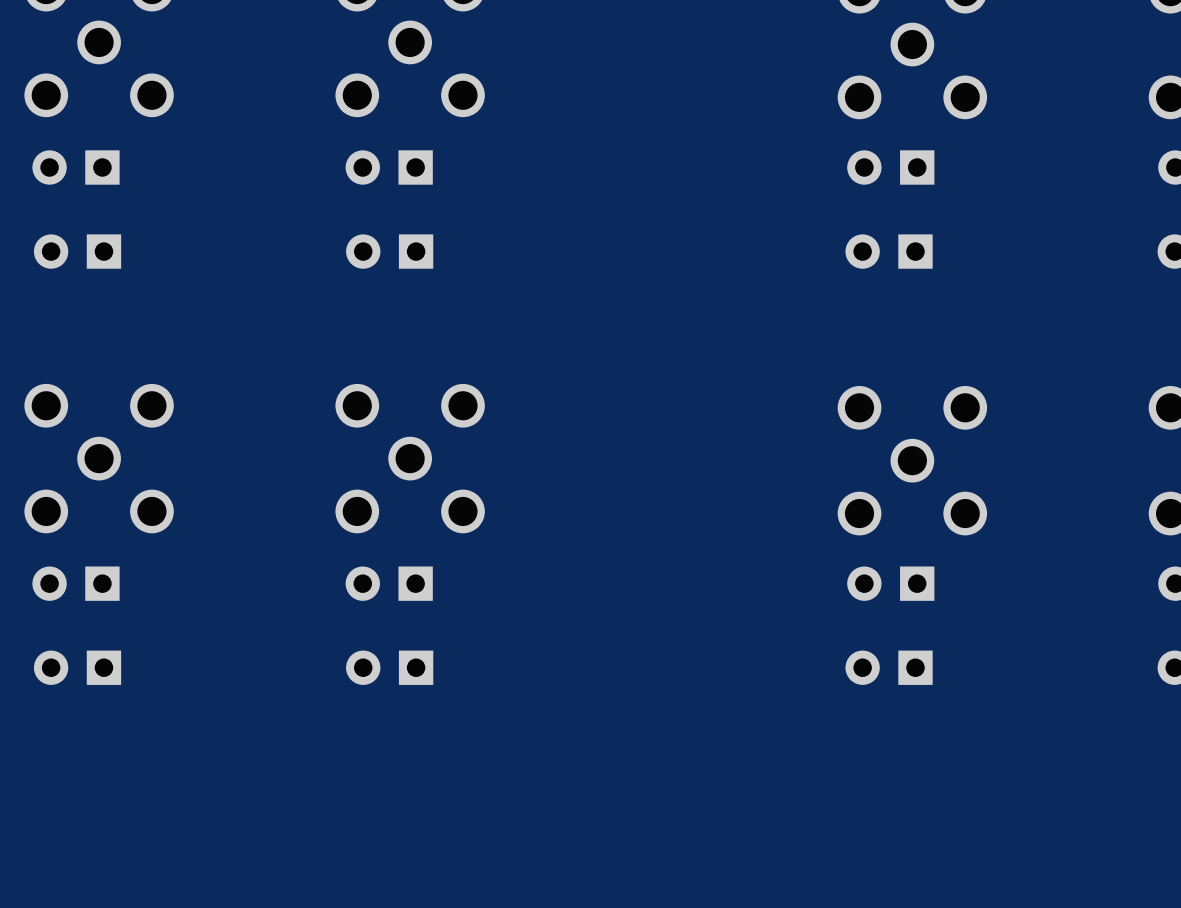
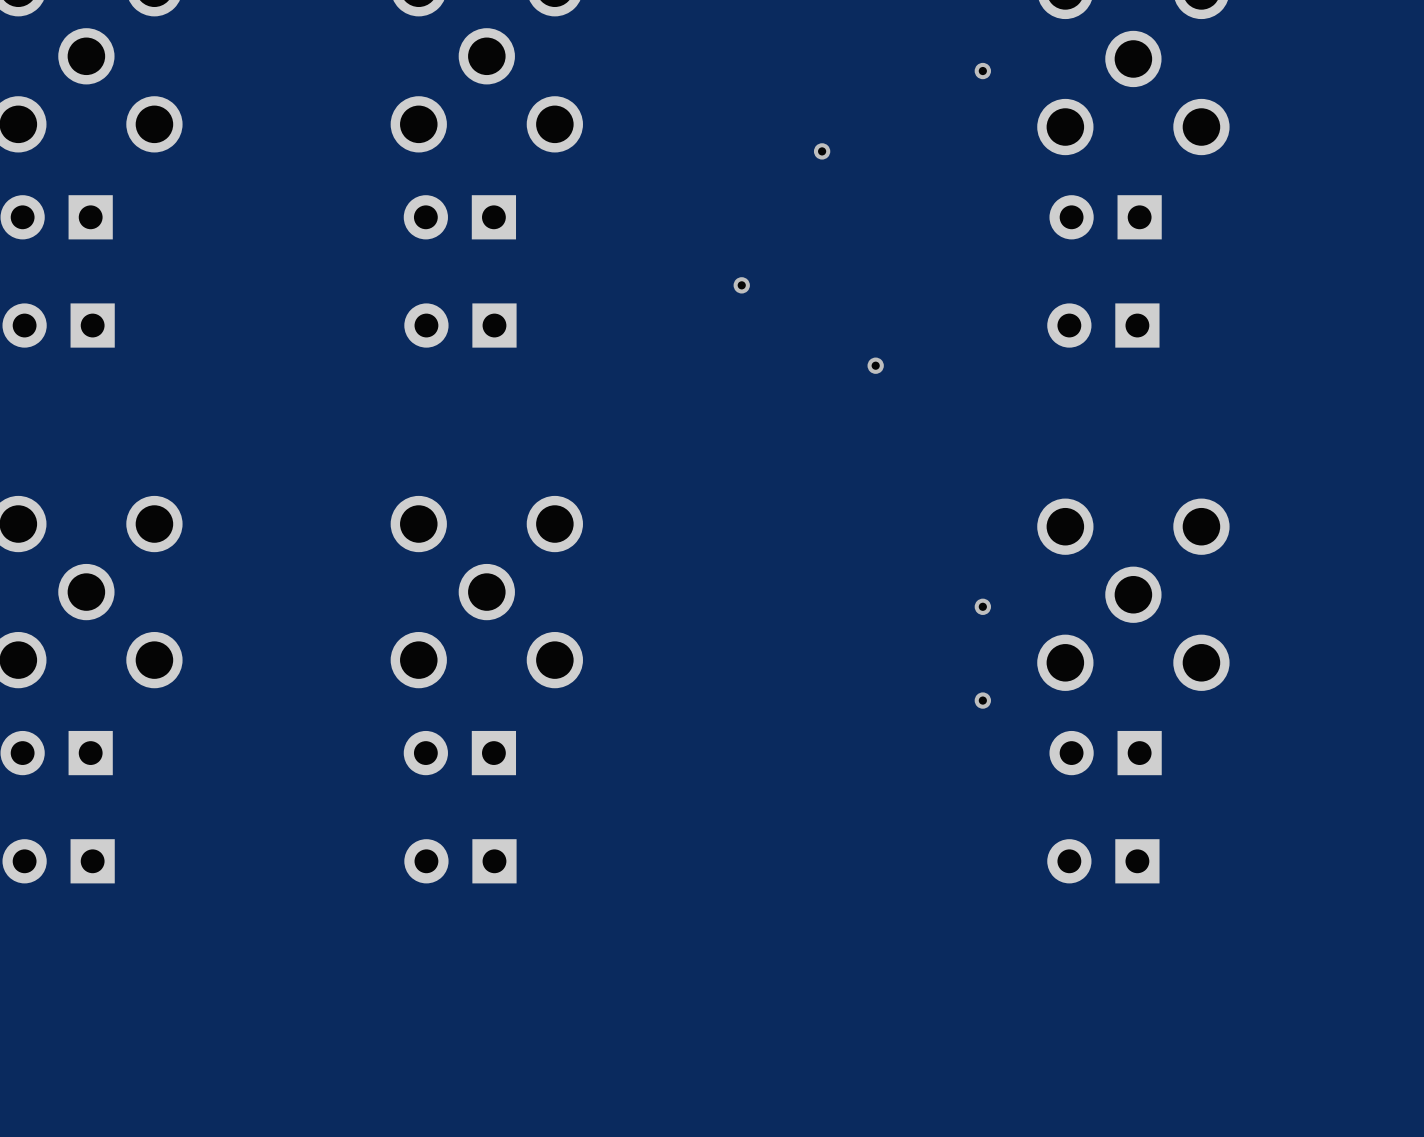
via: none -> (982, 71)
via: none -> (822, 151)
via: none -> (741, 285)
via: none -> (875, 365)
via: none -> (982, 606)
via: none -> (982, 700)

